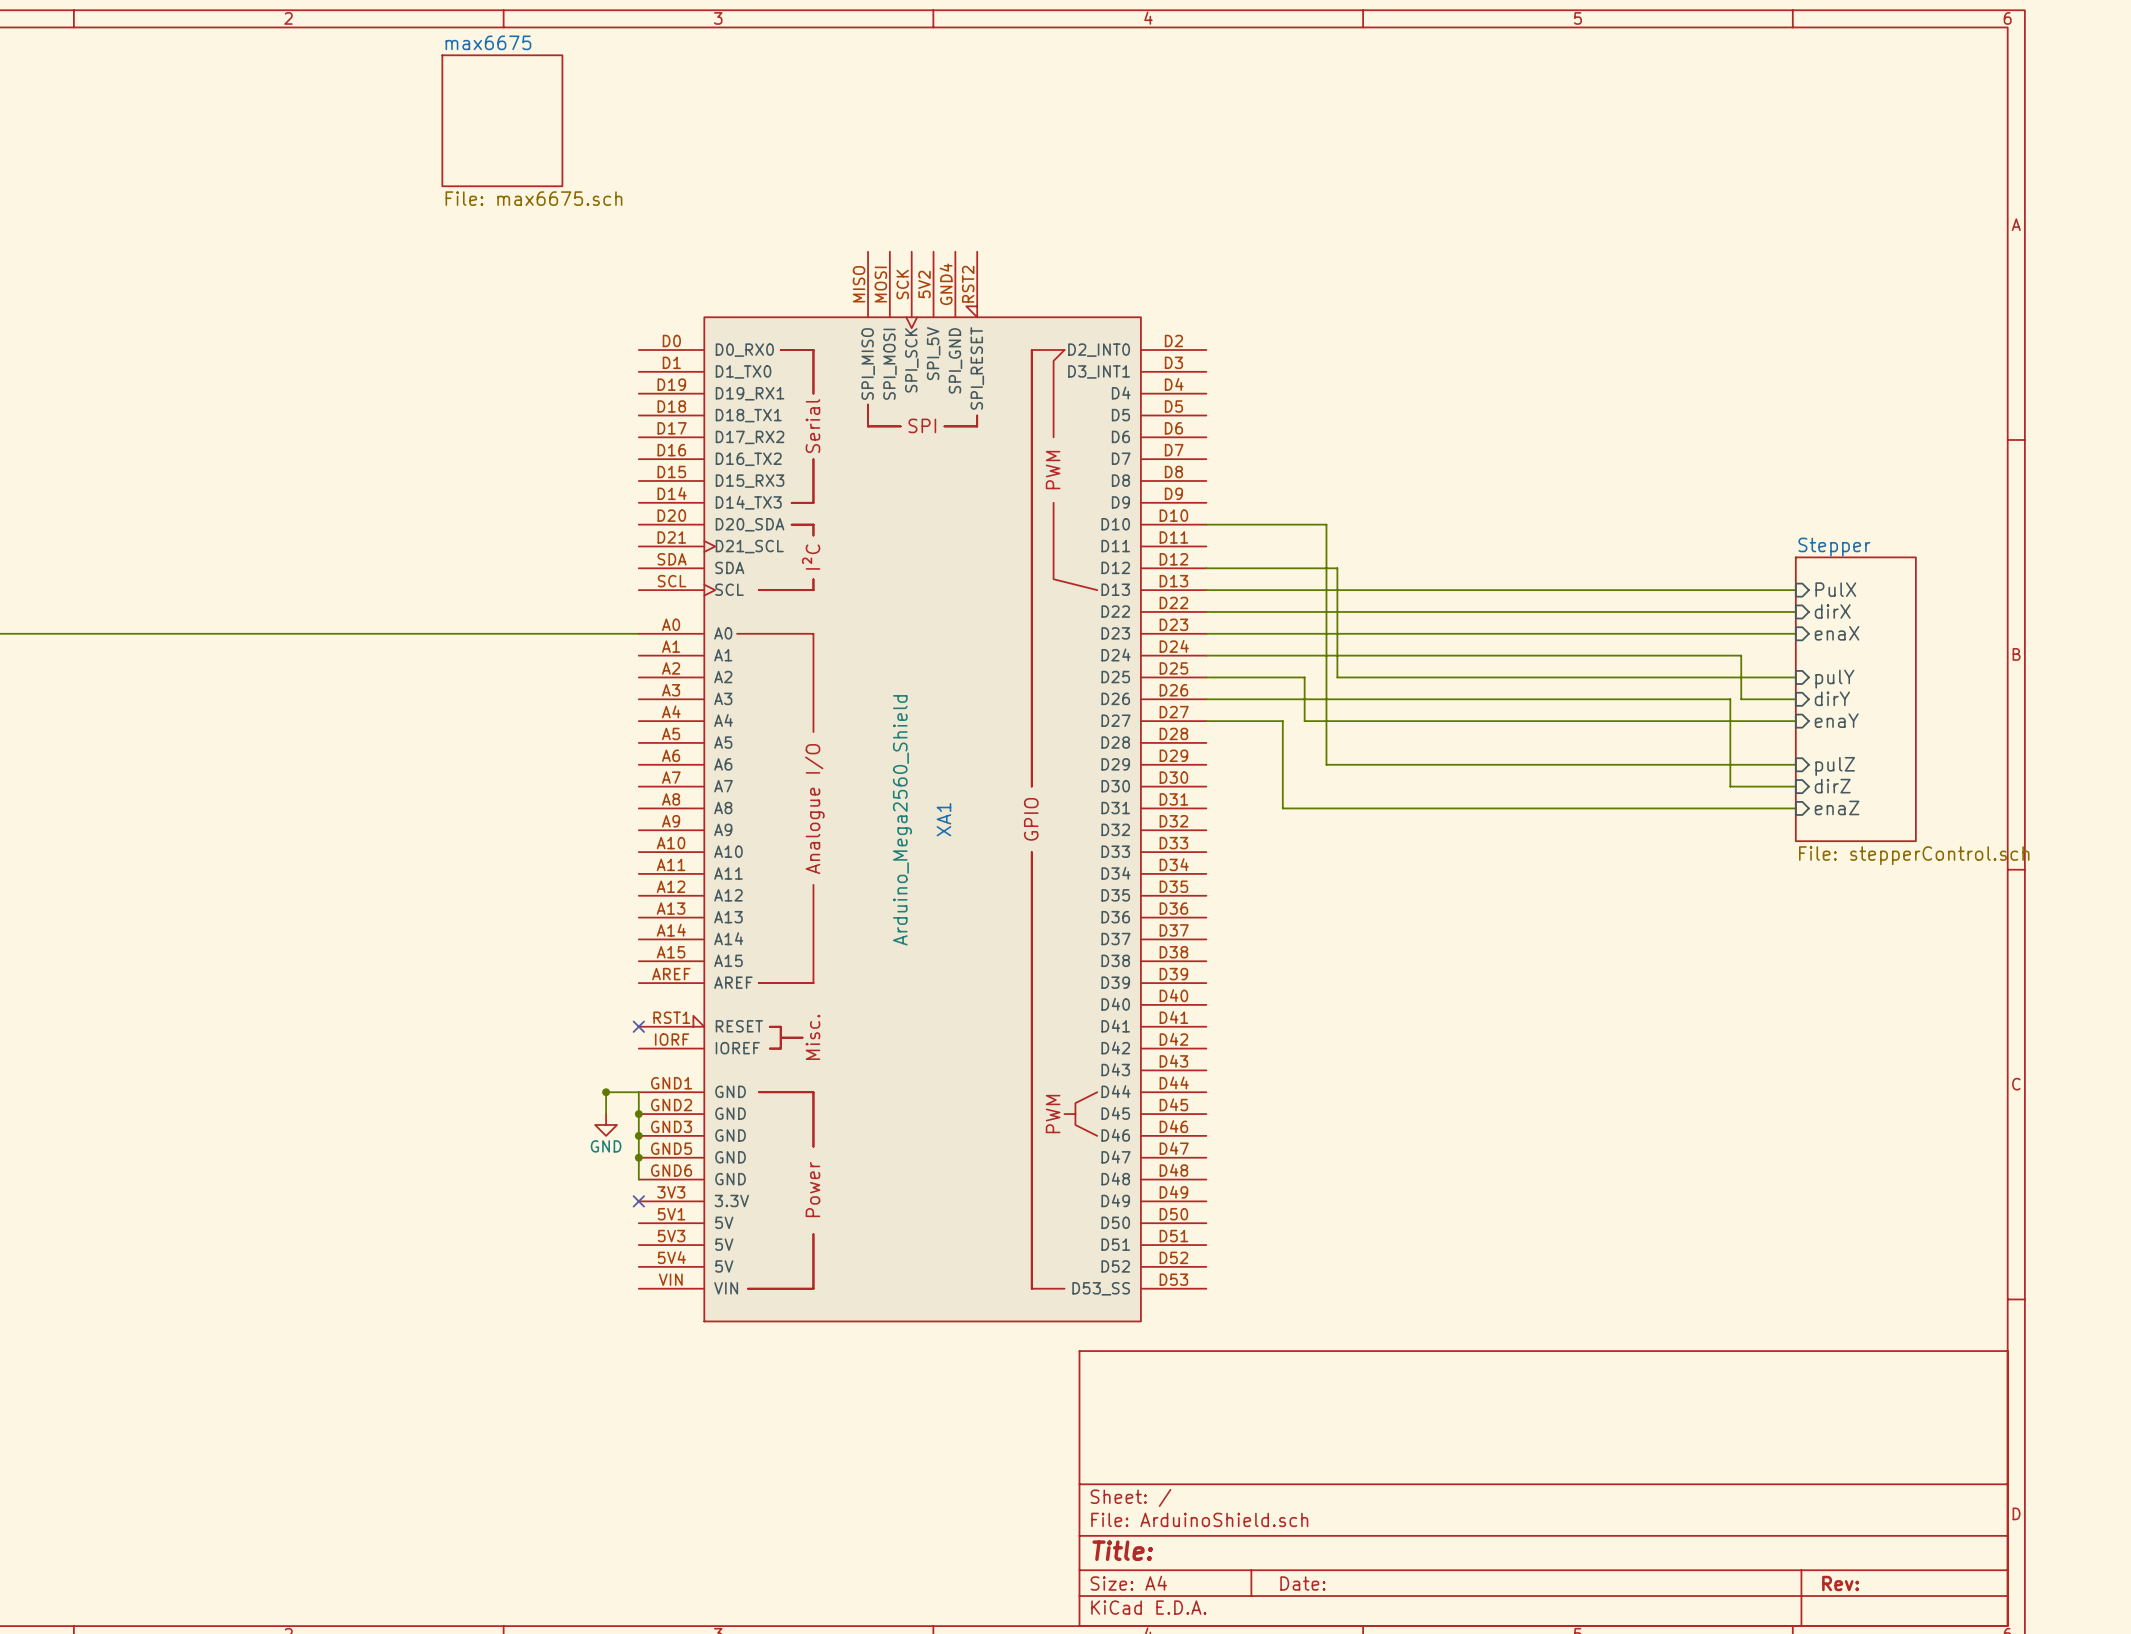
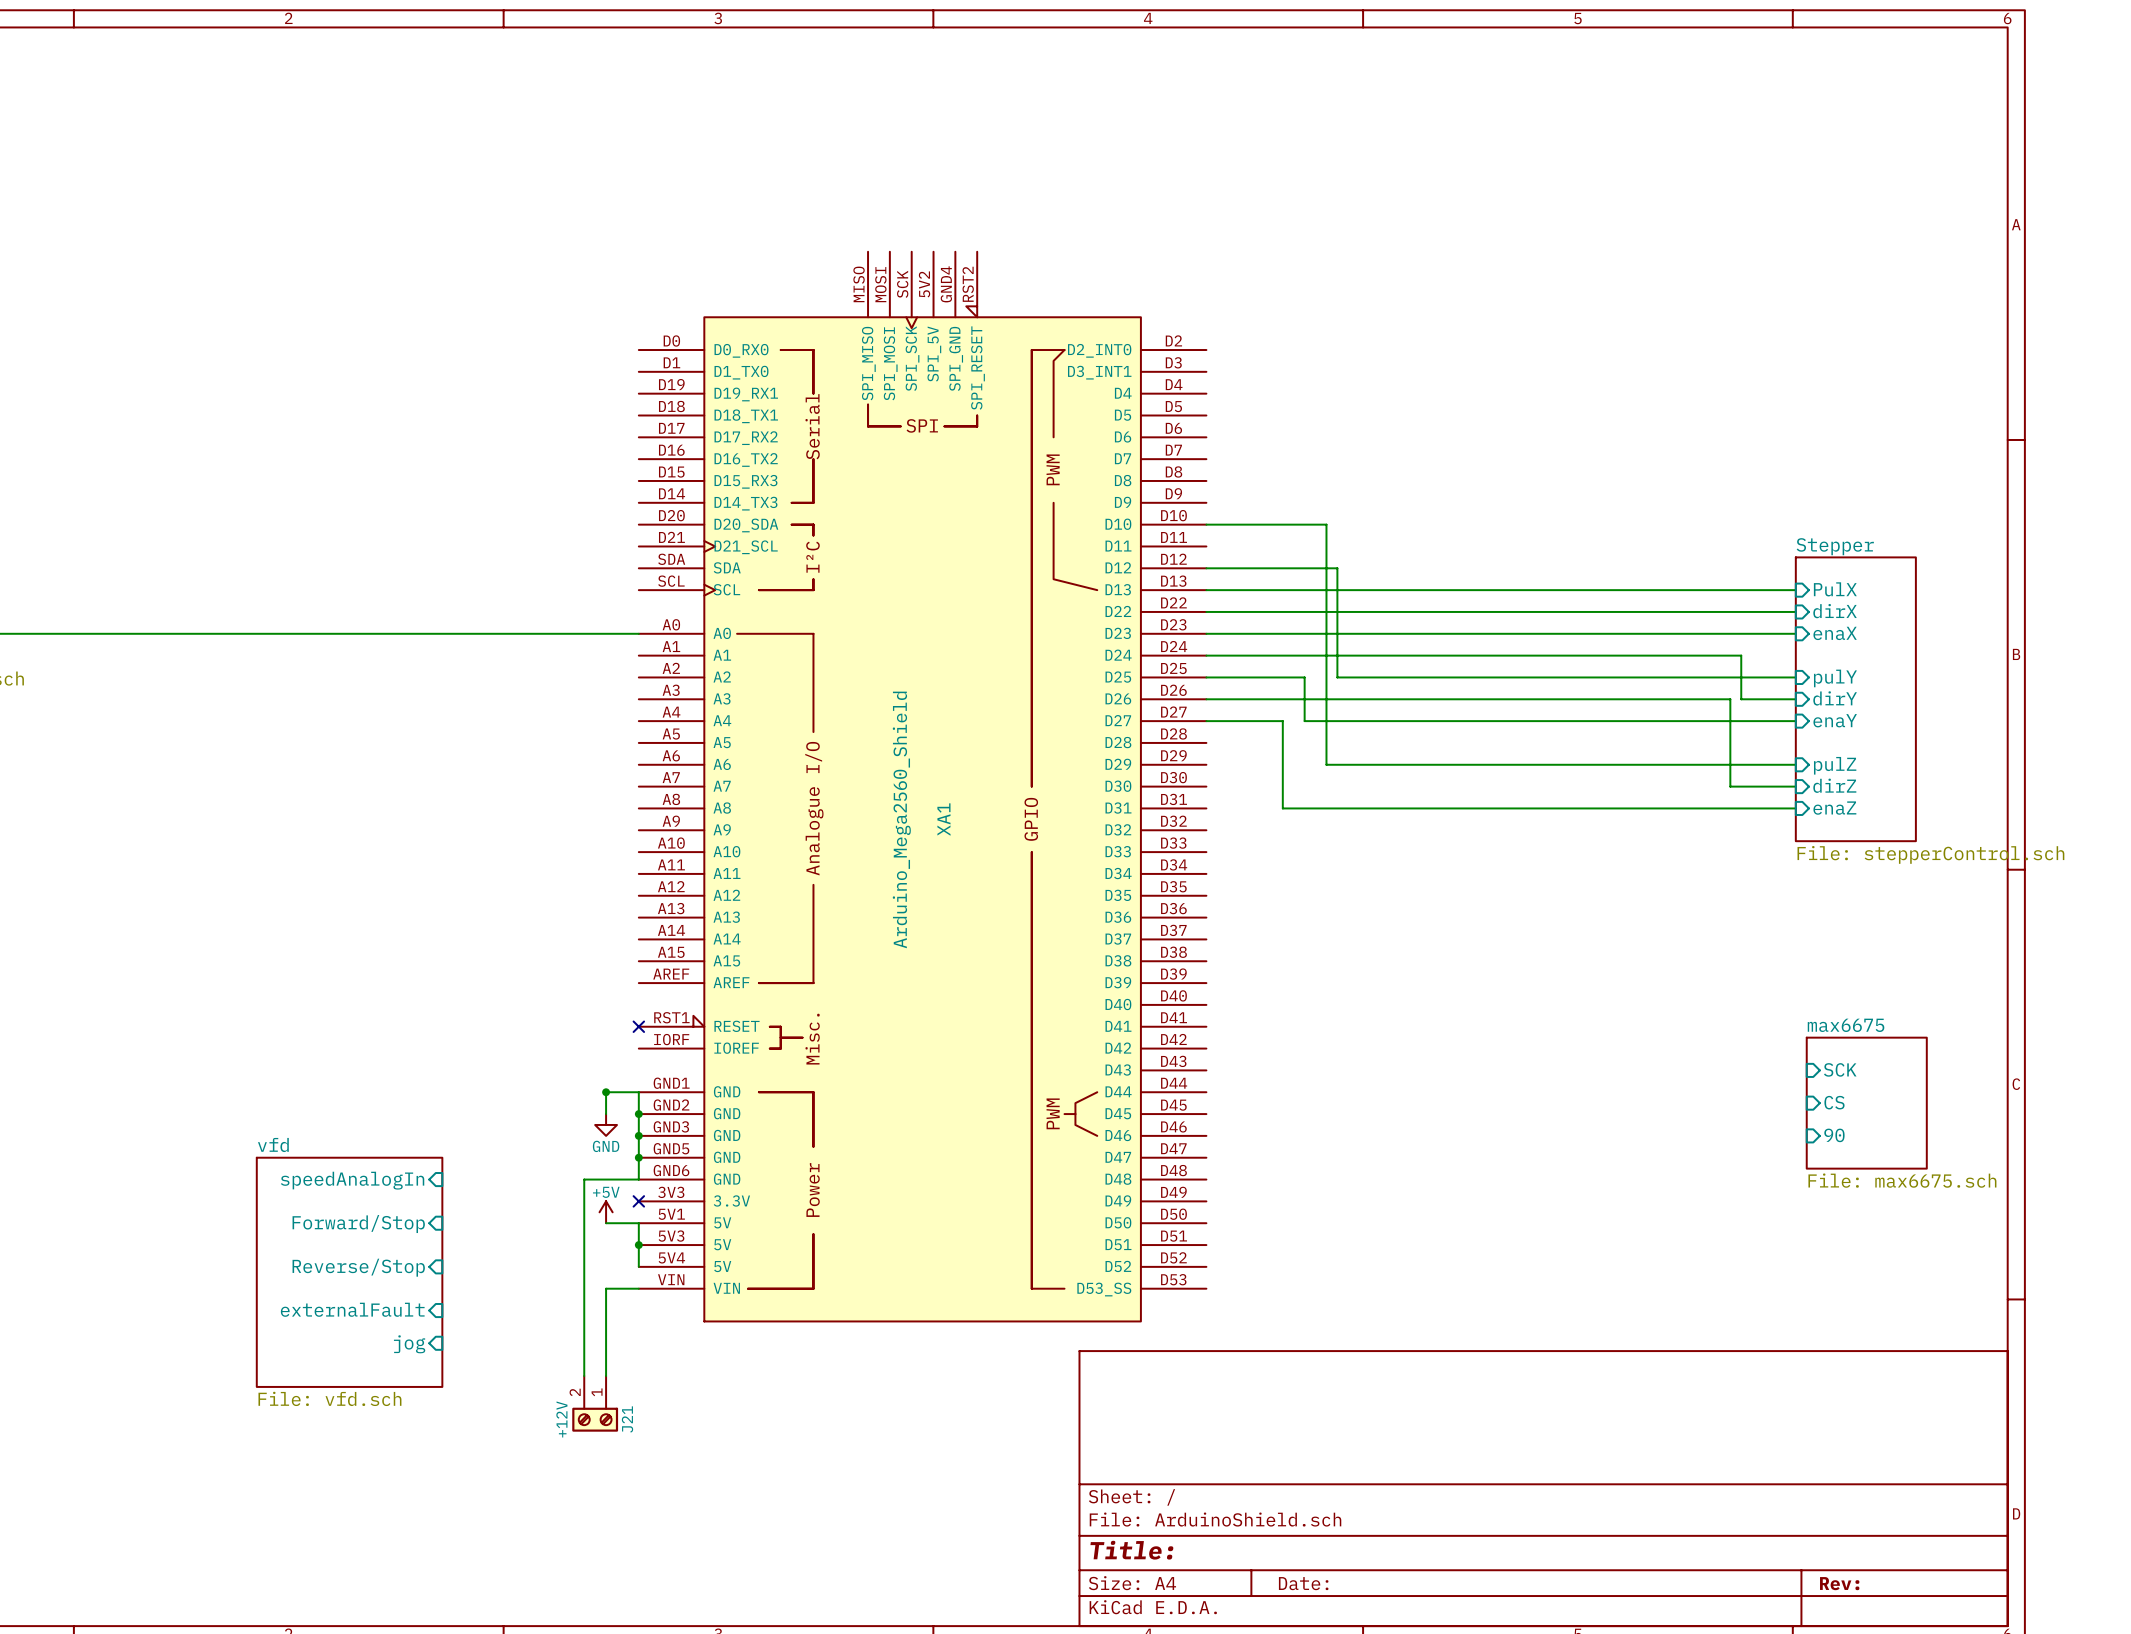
sheet max6675 position: (502, 120) -> (1866, 1103)
sheet pin: none -> SCK (1840, 1069)
sheet pin: none -> CS (1834, 1102)
sheet pin: none -> 90 (1834, 1135)
wire: none -> (638, 1179) (584, 1179) (584, 1376)
sheet pin: none -> speedAnalogIn (352, 1180)
power symbol: none -> +5V (606, 1212)
wire: none -> (606, 1223) (638, 1223) (638, 1266)
sheet pin: none -> Forward/Stop (358, 1224)
junction: none -> (638, 1245)
sheet pin: none -> Reverse/Stop (358, 1267)
sheet vfd: none -> File: vfd.sch (349, 1272)
wire: none -> (638, 1288) (606, 1288) (606, 1376)
sheet pin: none -> externalFault (352, 1309)
sheet pin: none -> jog (409, 1344)
J21: none -> +12V (595, 1403)

